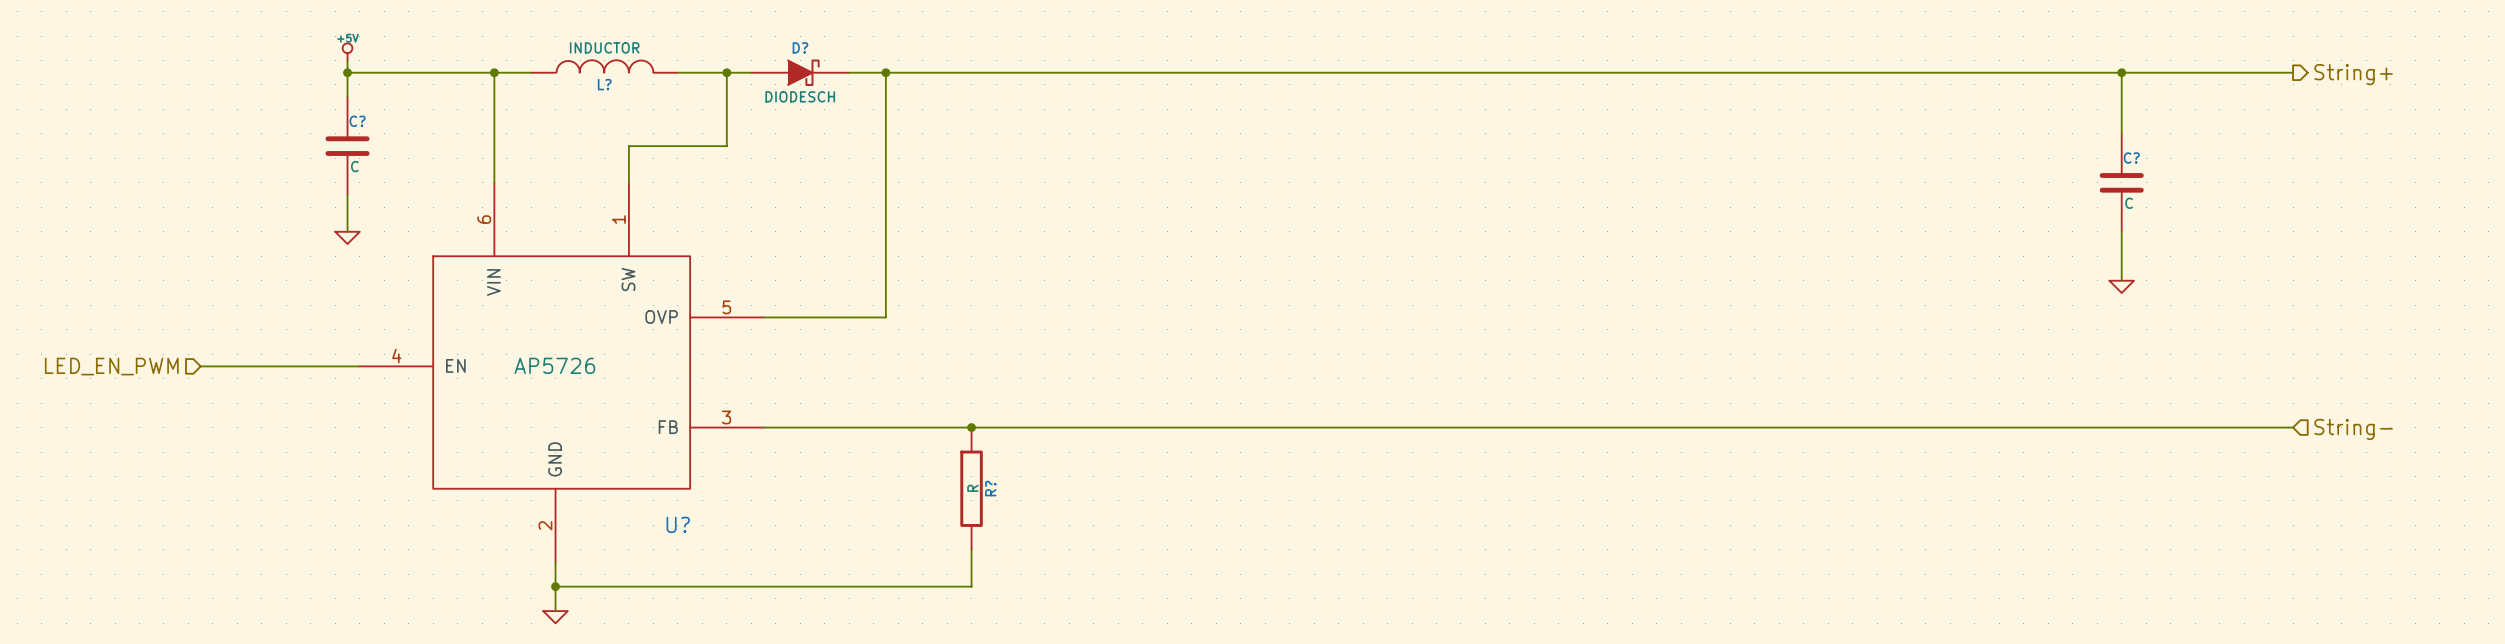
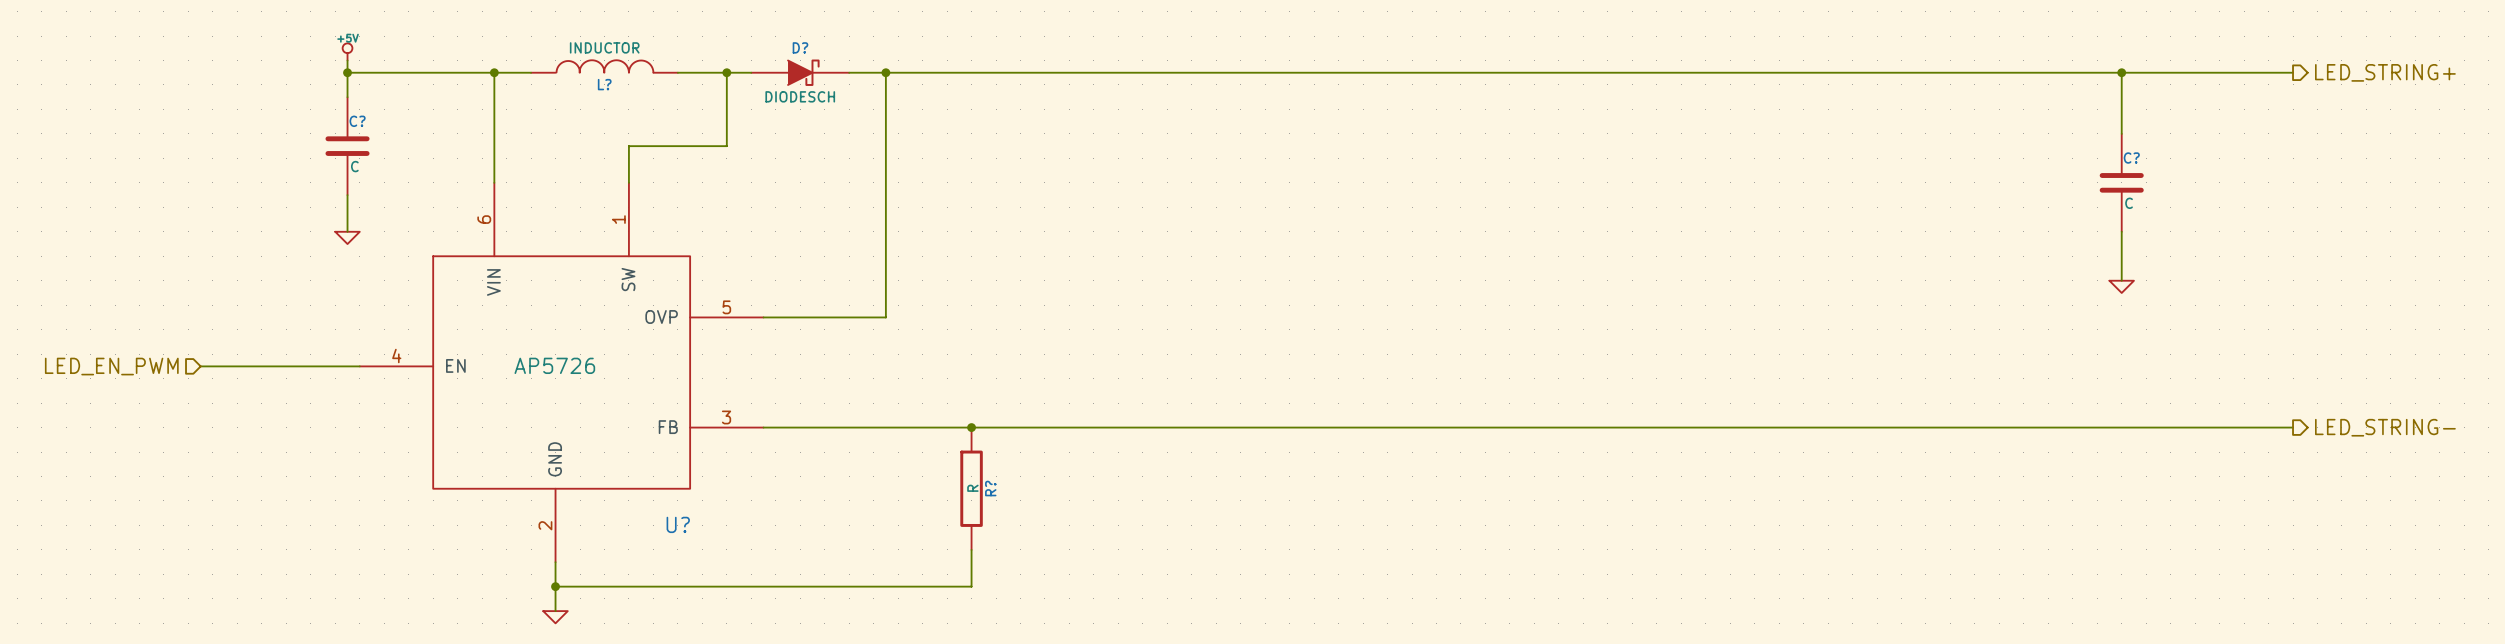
hierarchical label: String+ (2353, 74) -> LED_STRING+ (2385, 72)
hierarchical label shape: input (2353, 429) -> output (2385, 427)
hierarchical label: String- (2353, 429) -> LED_STRING- (2385, 427)

